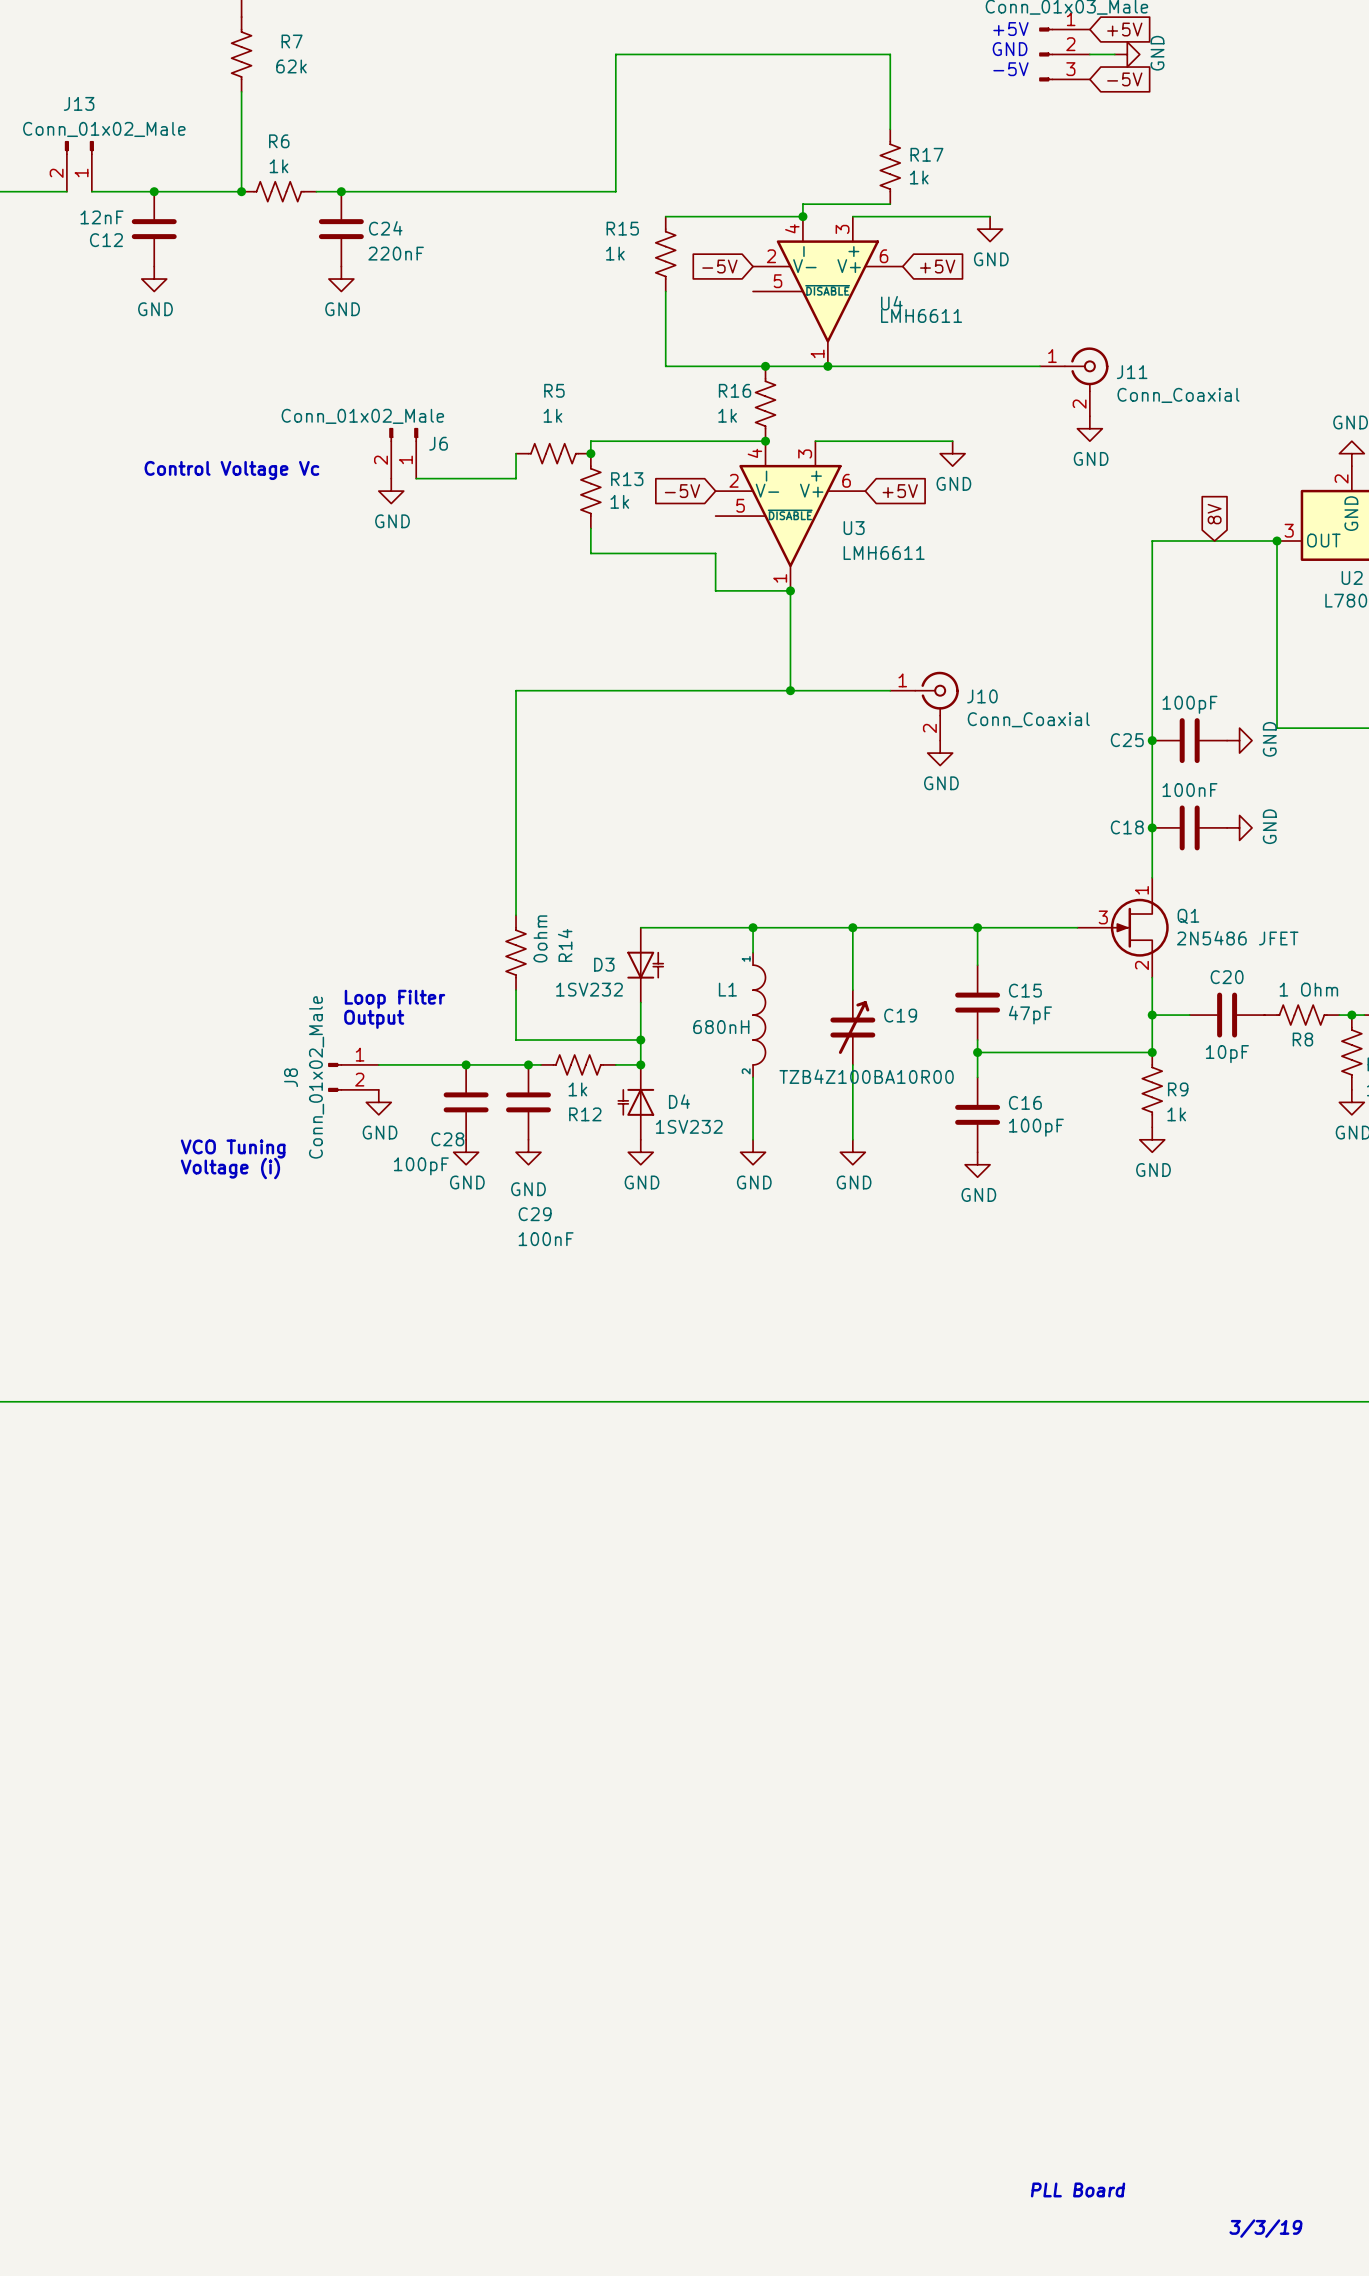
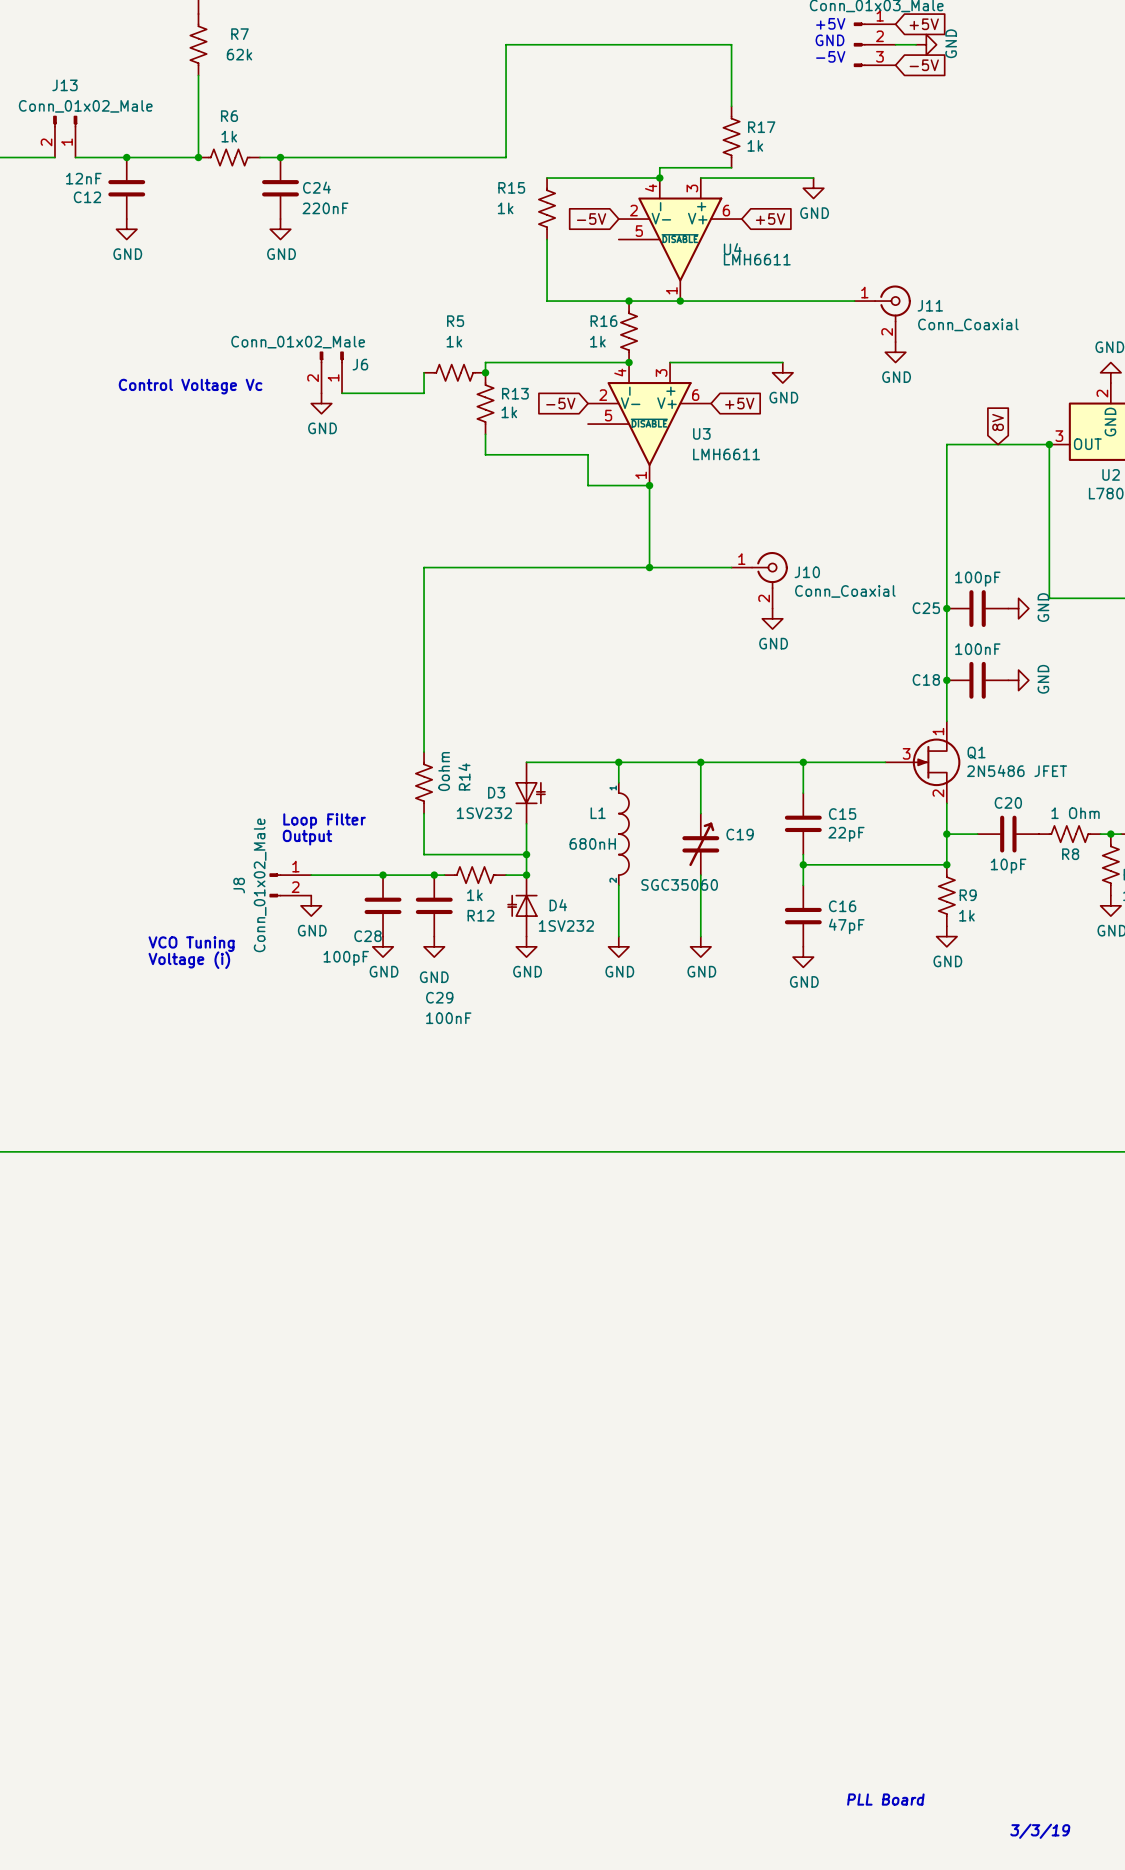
C15 value: 47pF (1030, 1015) -> 22pF (846, 834)
C19 value: TZB4Z100BA10R00 (866, 1076) -> SGC35060 (679, 884)
C16 value: 100pF (1036, 1127) -> 47pF (846, 926)

